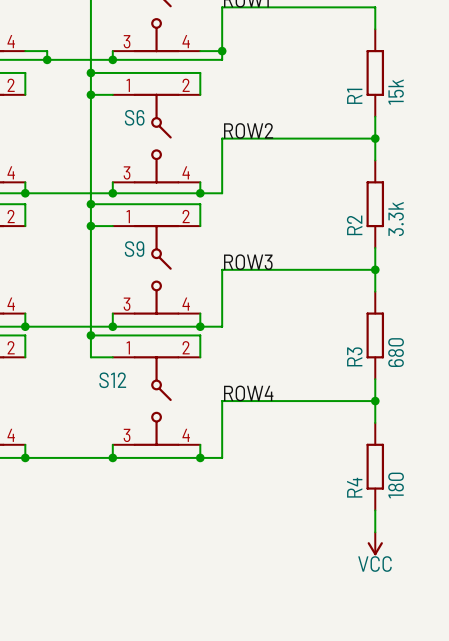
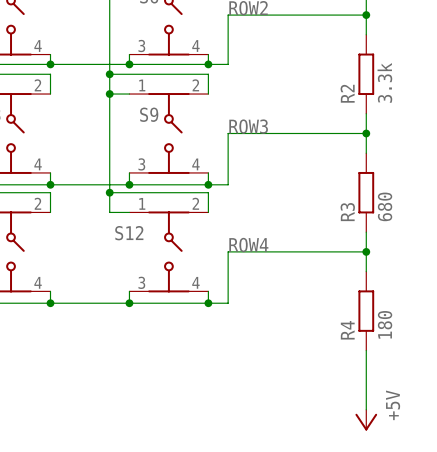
power symbol: VCC (375, 543) -> none
power symbol: none -> +5V (366, 420)

